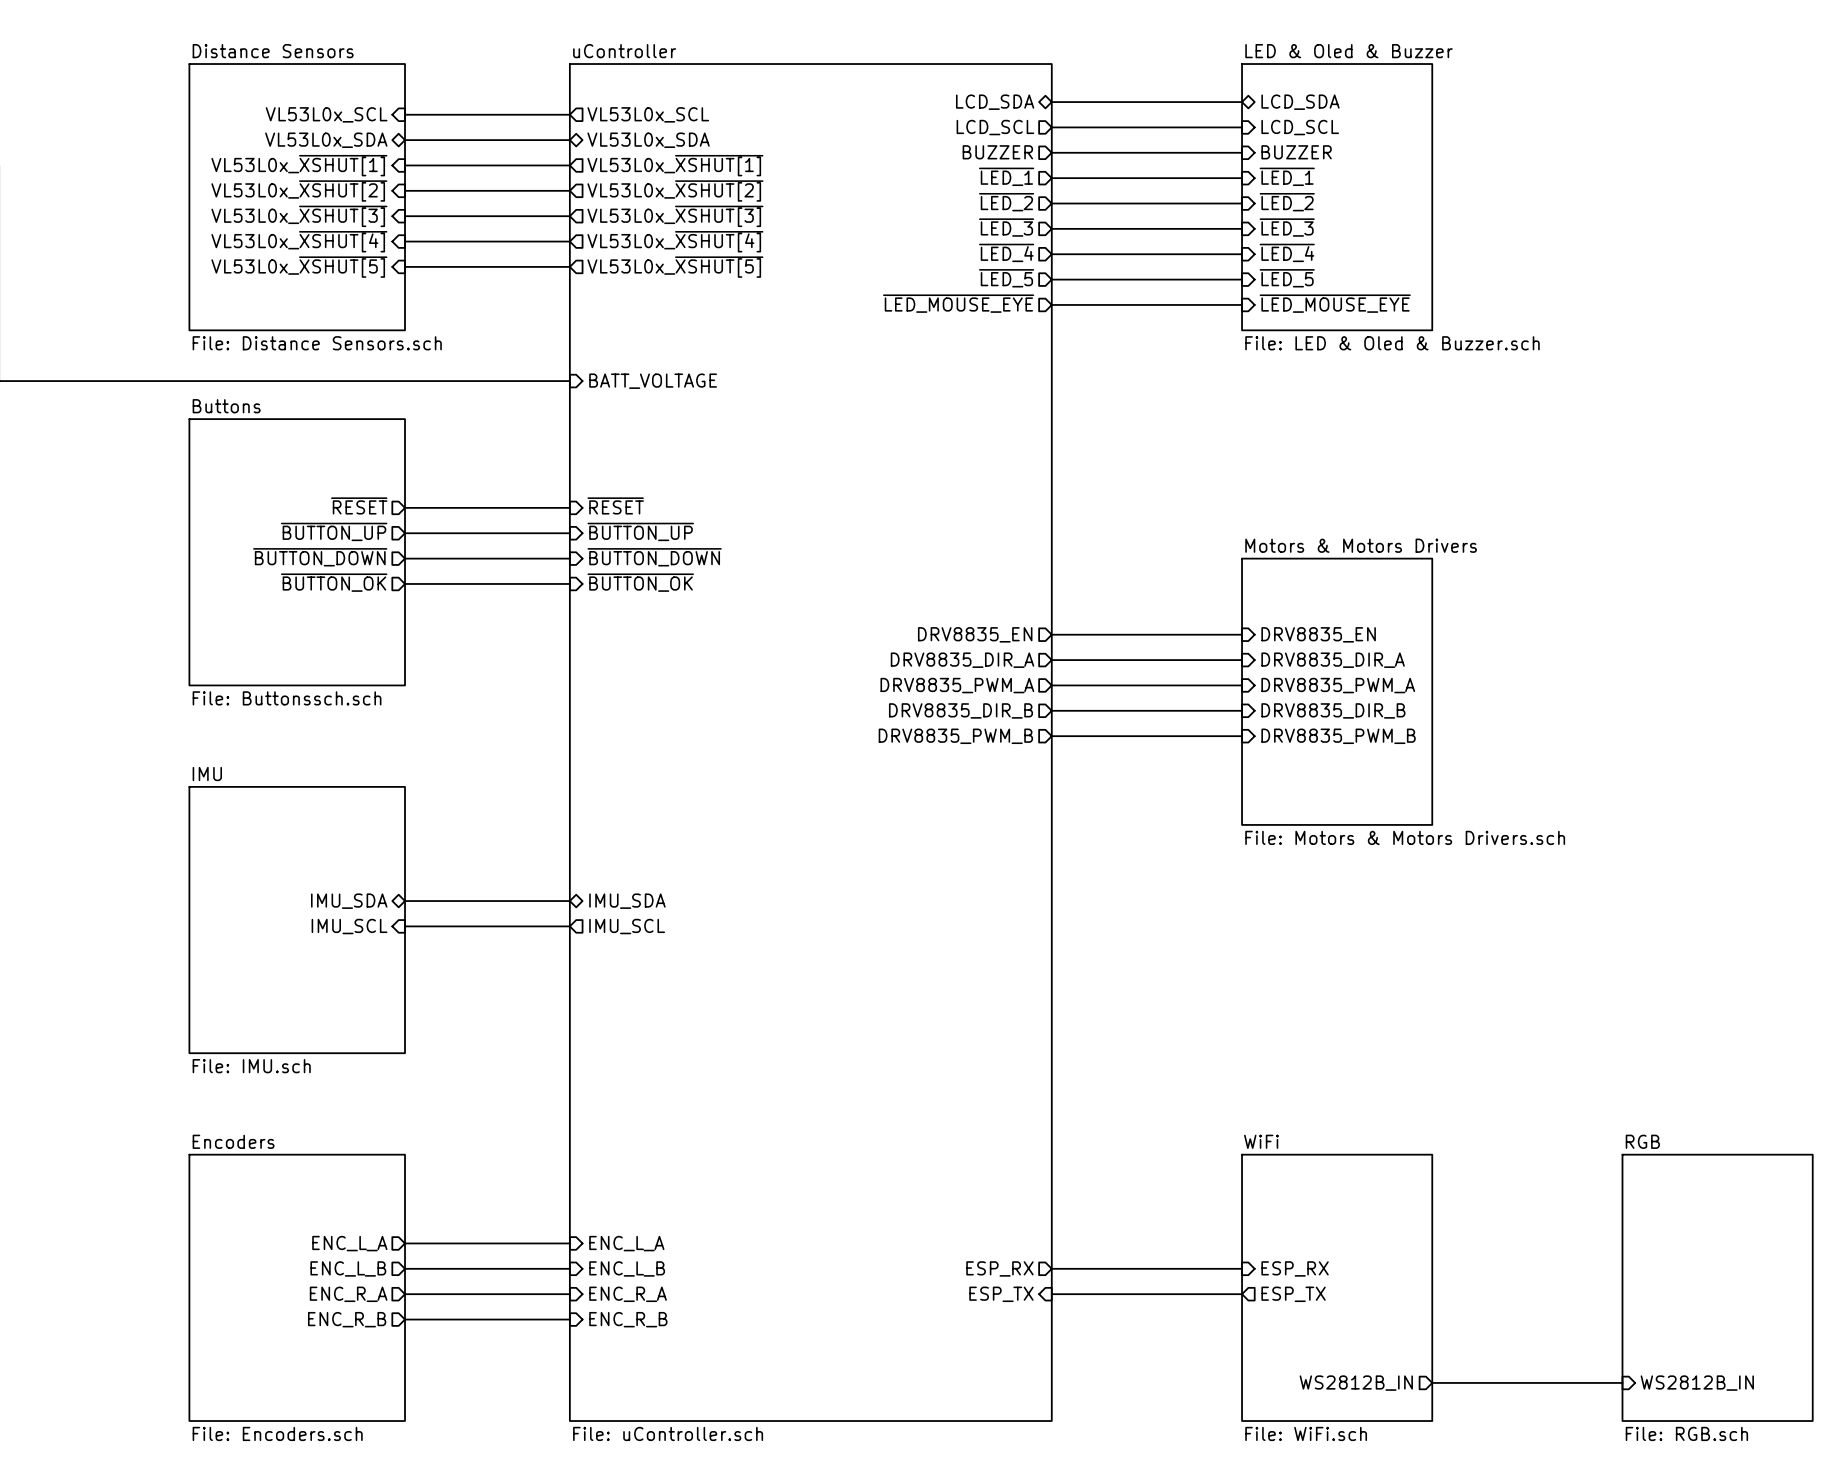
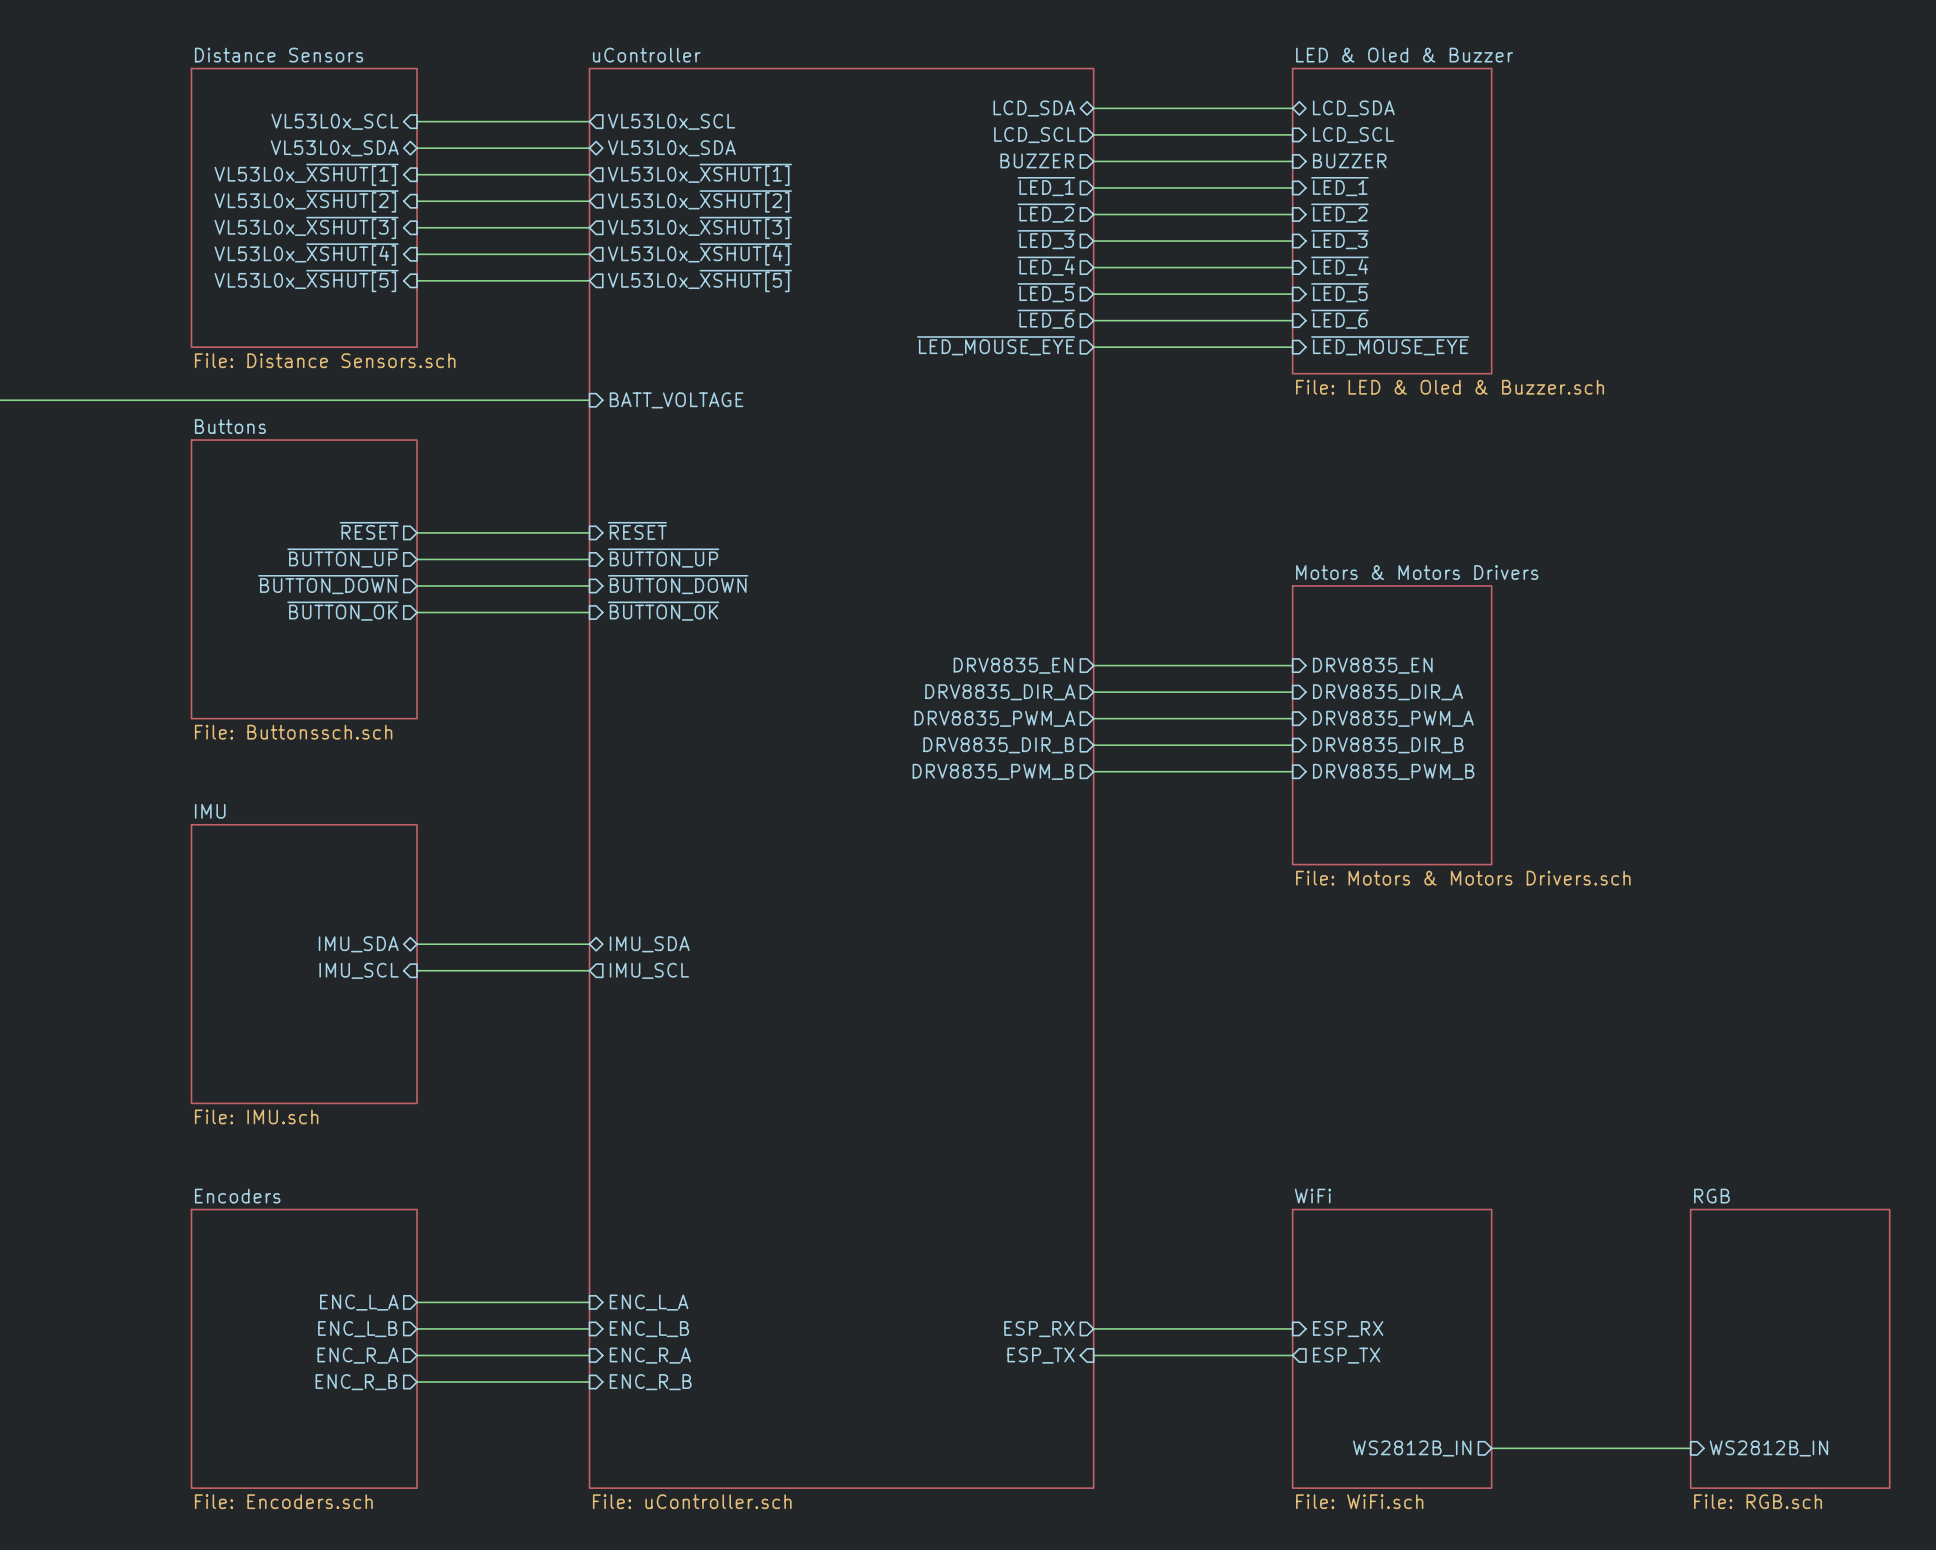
sheet LED & Oled & Buzzer: File: LED & Oled & Buzzer.sch (1337, 197) -> none
sheet LED & Oled & Buzzer: none -> File: LED & Oled & Buzzer.sch (1392, 221)
sheet pin: ~{LED_MOUSE_EYE} (958, 303) -> ~{LED_6} (1046, 319)
sheet pin: ~{LED_MOUSE_EYE} (1335, 303) -> ~{LED_6} (1339, 319)
sheet pin: none -> ~{LED_MOUSE_EYE} (996, 345)
sheet pin: none -> ~{LED_MOUSE_EYE} (1390, 345)
wire: none -> (1093, 347) (1292, 347)

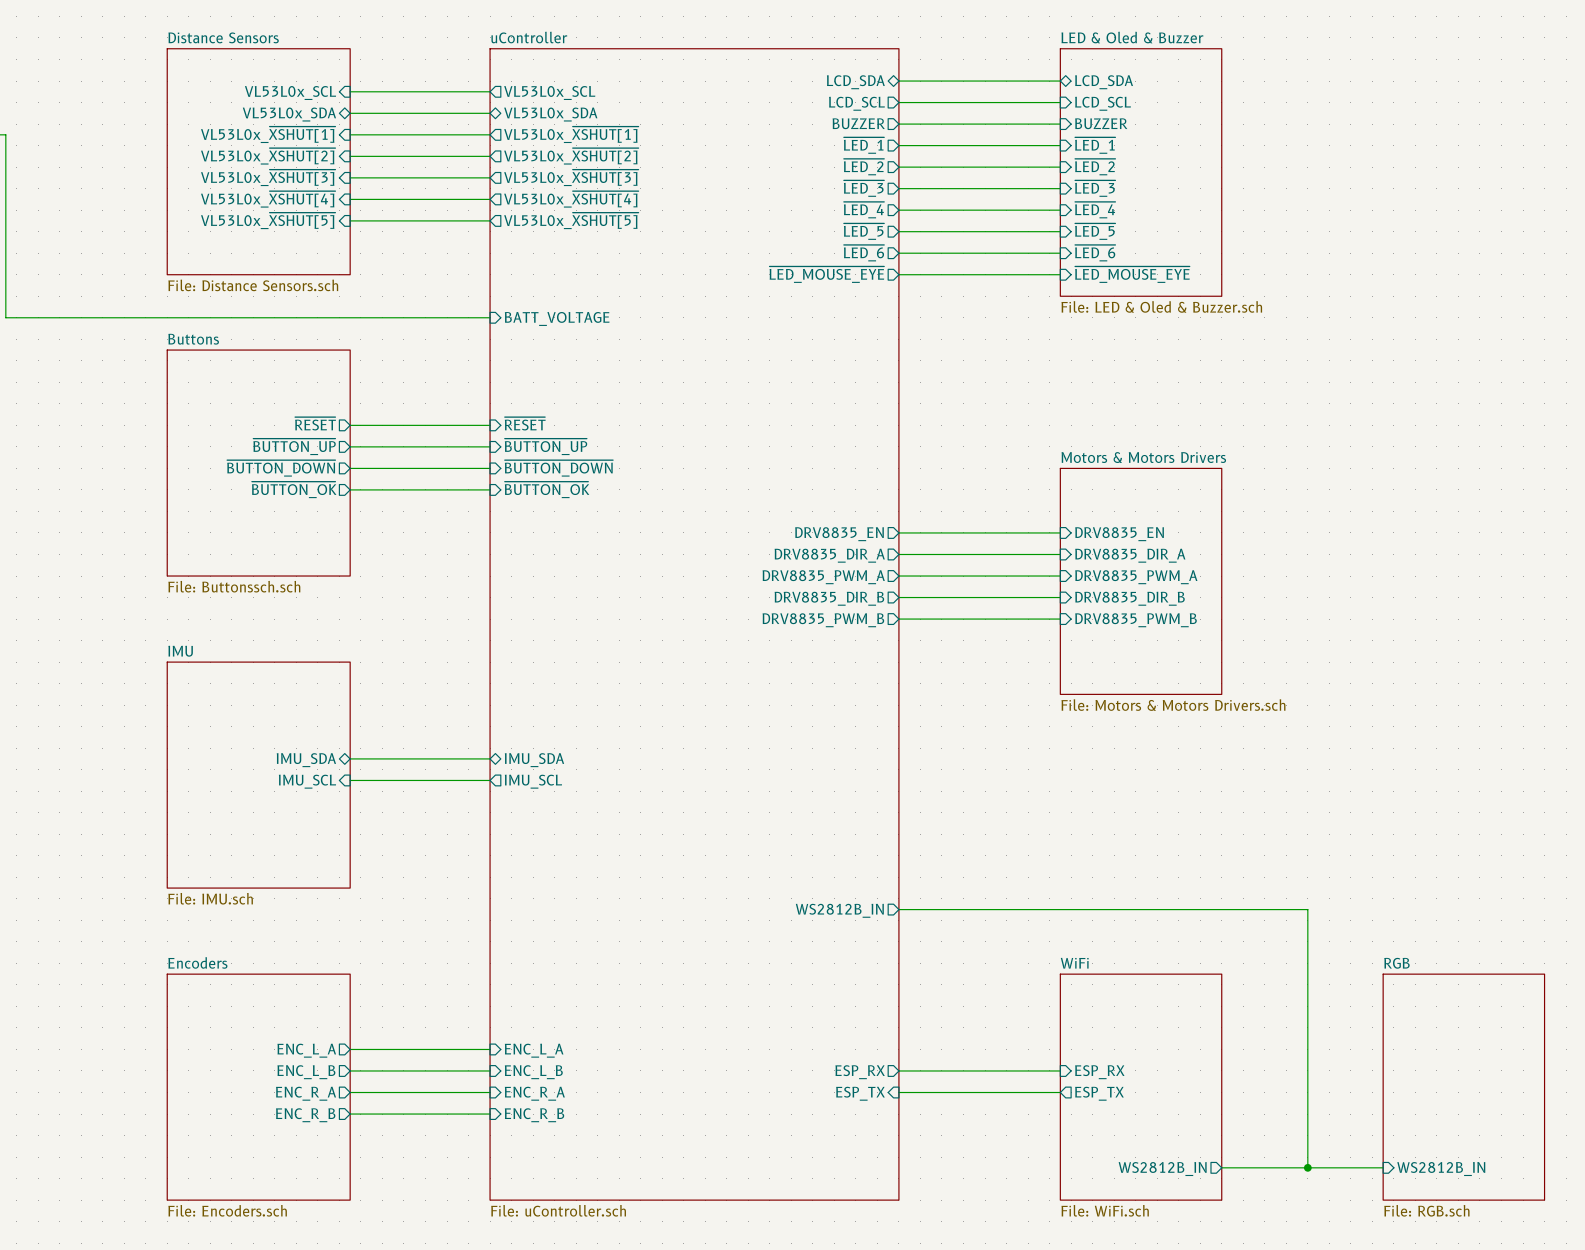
wire: none -> (898, 909) (1307, 909) (1307, 1167)
sheet pin: none -> WS2812B_IN (839, 910)
junction: none -> (1307, 1167)

